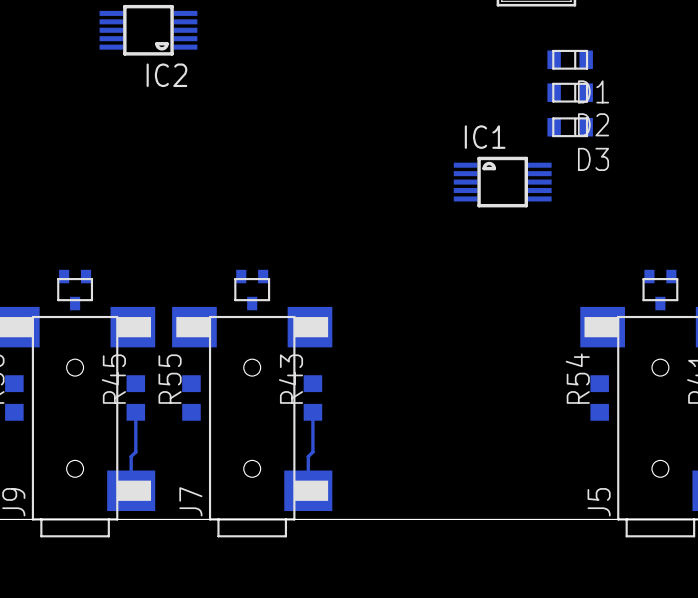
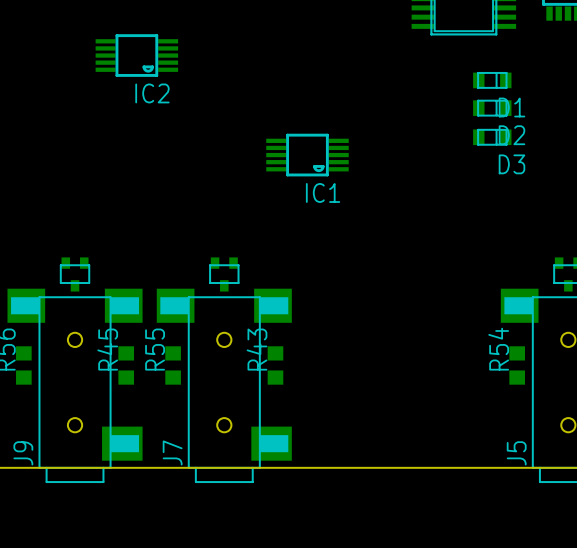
IC1 rotation: 0° (502, 182) -> 180° (307, 155)
IC1 position: (502, 182) -> (307, 155)
track: (135, 412) (135, 451) (131, 456) (131, 490) -> none
track: (312, 412) (312, 451) (308, 456) (308, 490) -> none

